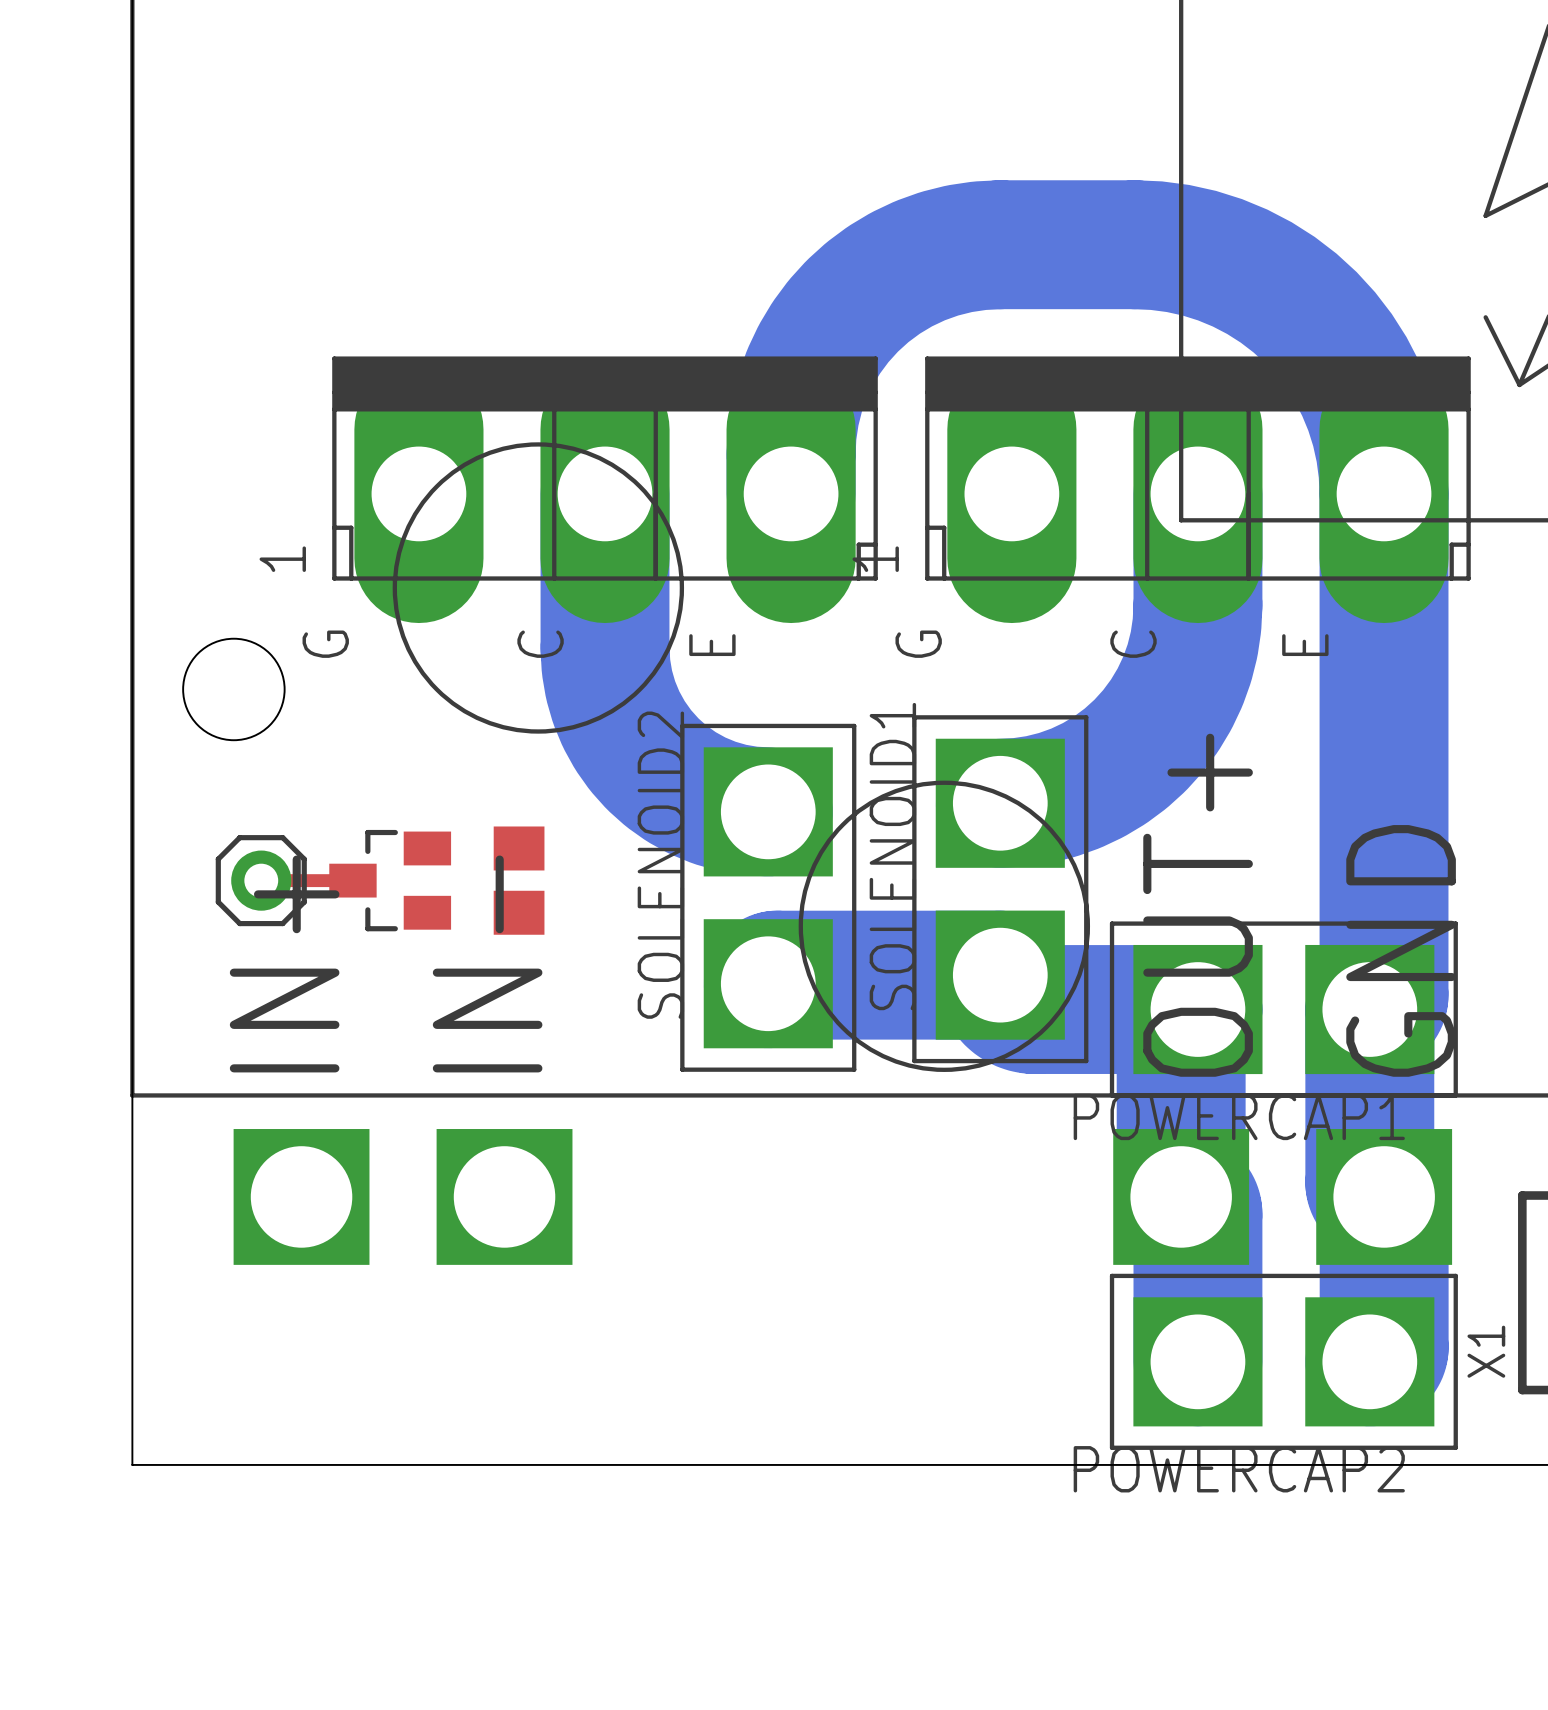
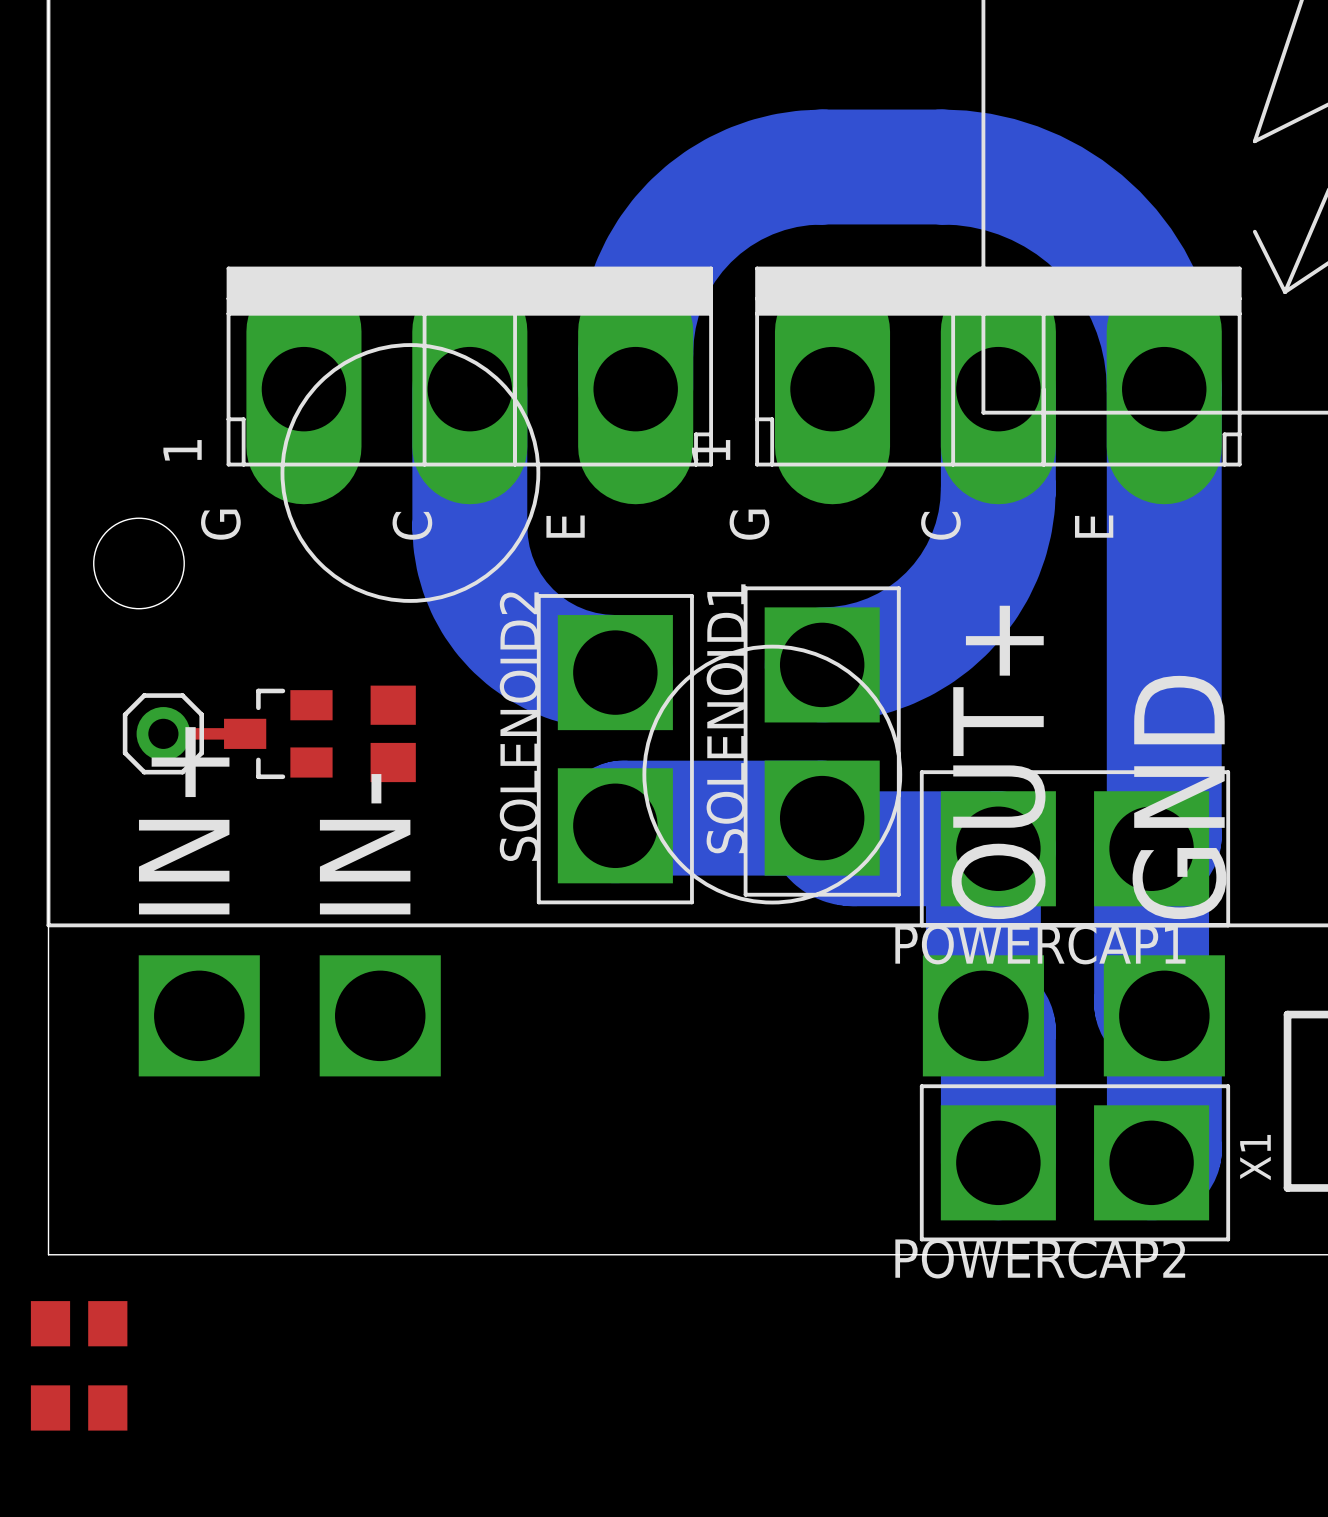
part: none -> (79, 1323)
part: none -> (79, 1407)

